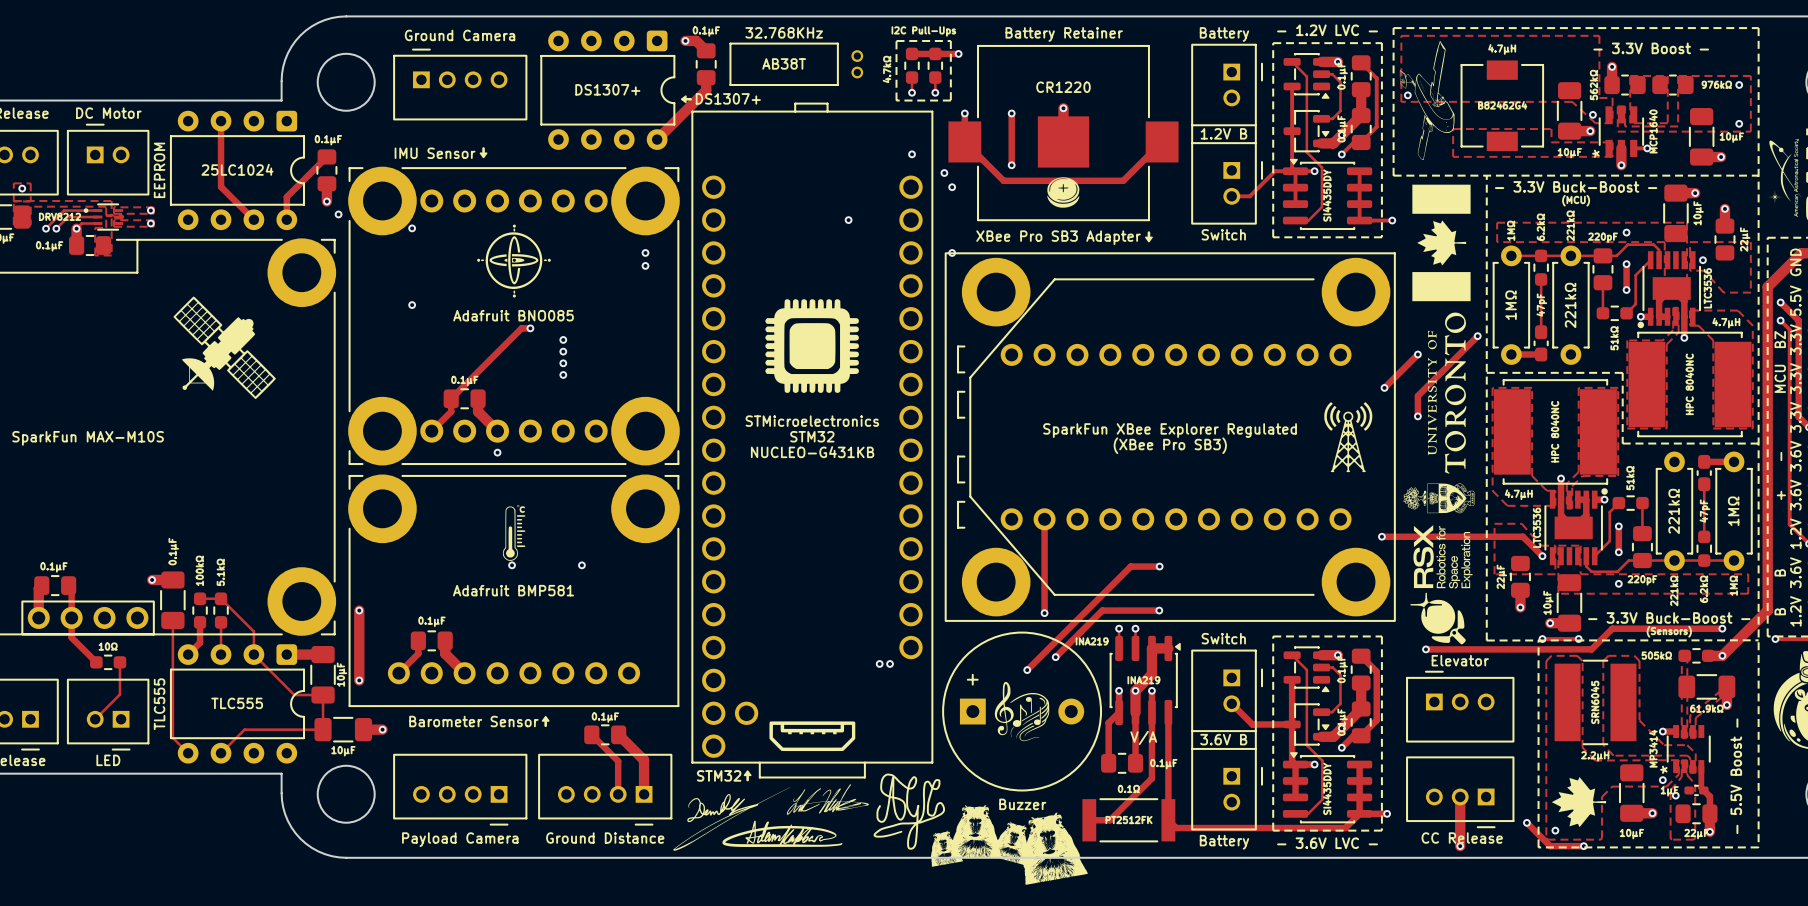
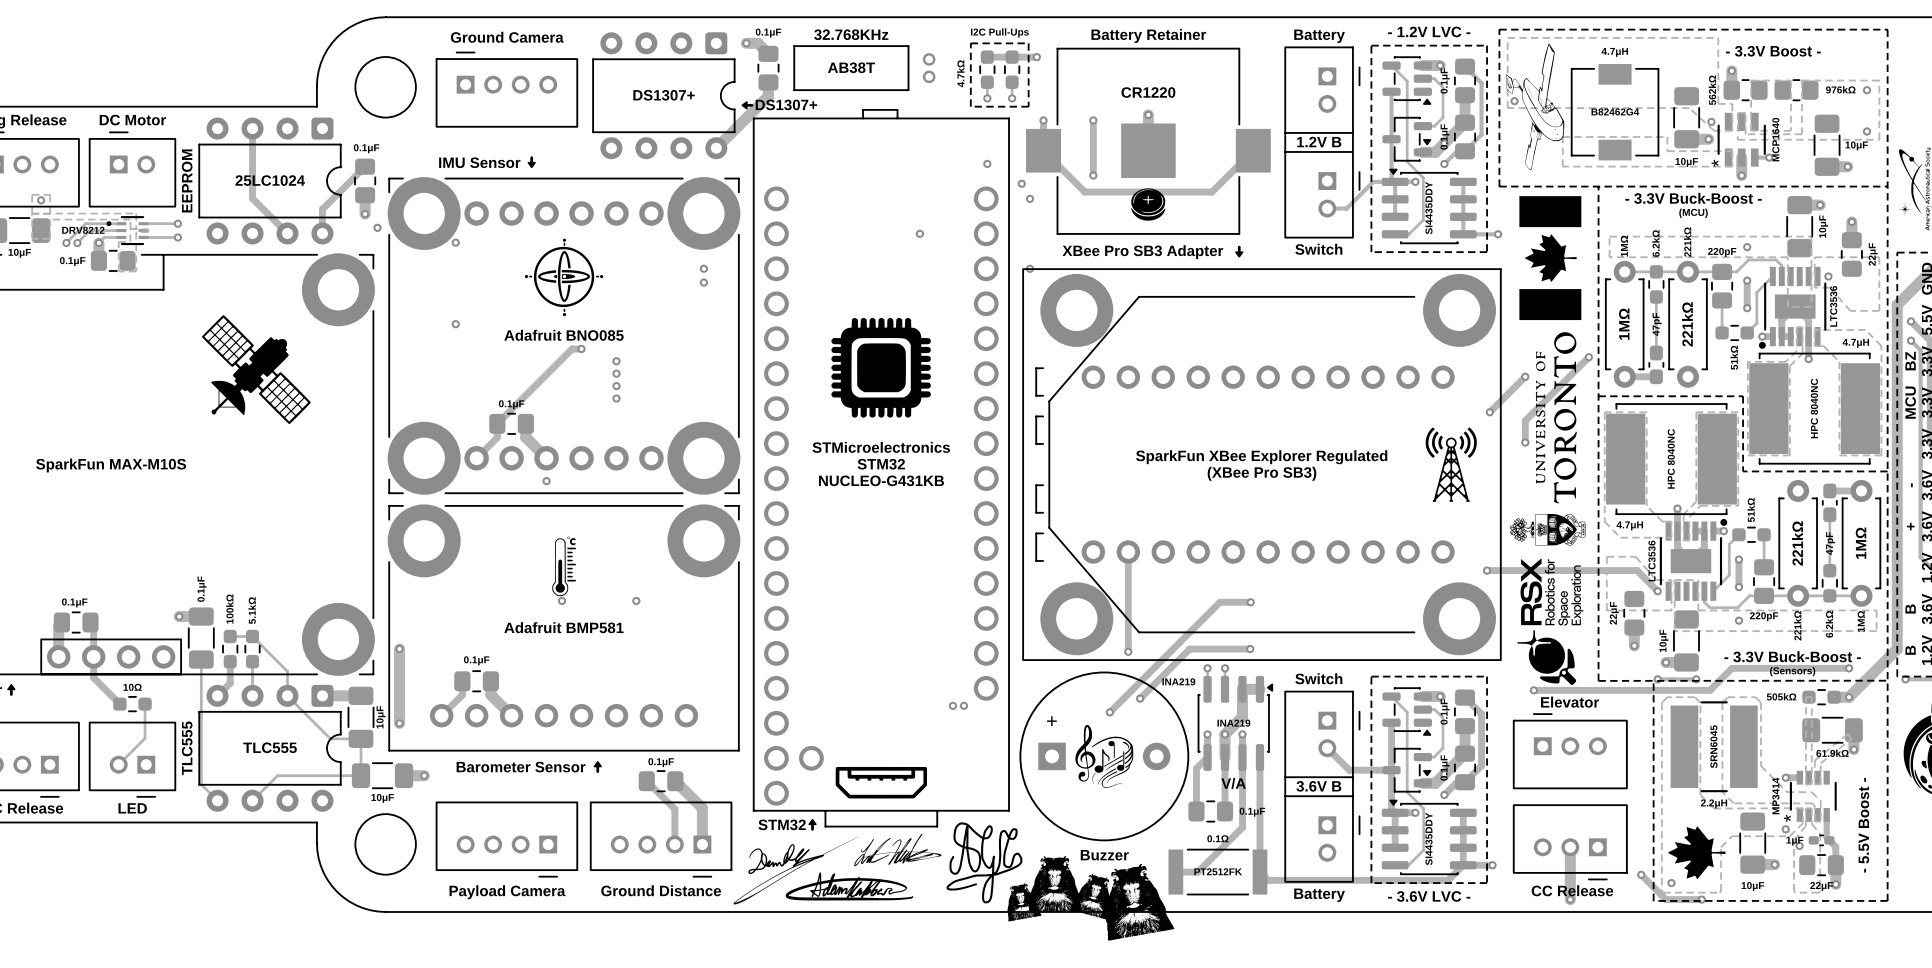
zone outline: (113, 207) (113, 213) (153, 213) (153, 207) (113, 207) -> none
track: none -> (143, 223) (179, 223)
zone outline: (113, 220) (113, 226) (153, 226) (153, 220) (113, 220) -> none
track: none -> (143, 237) (179, 237)

